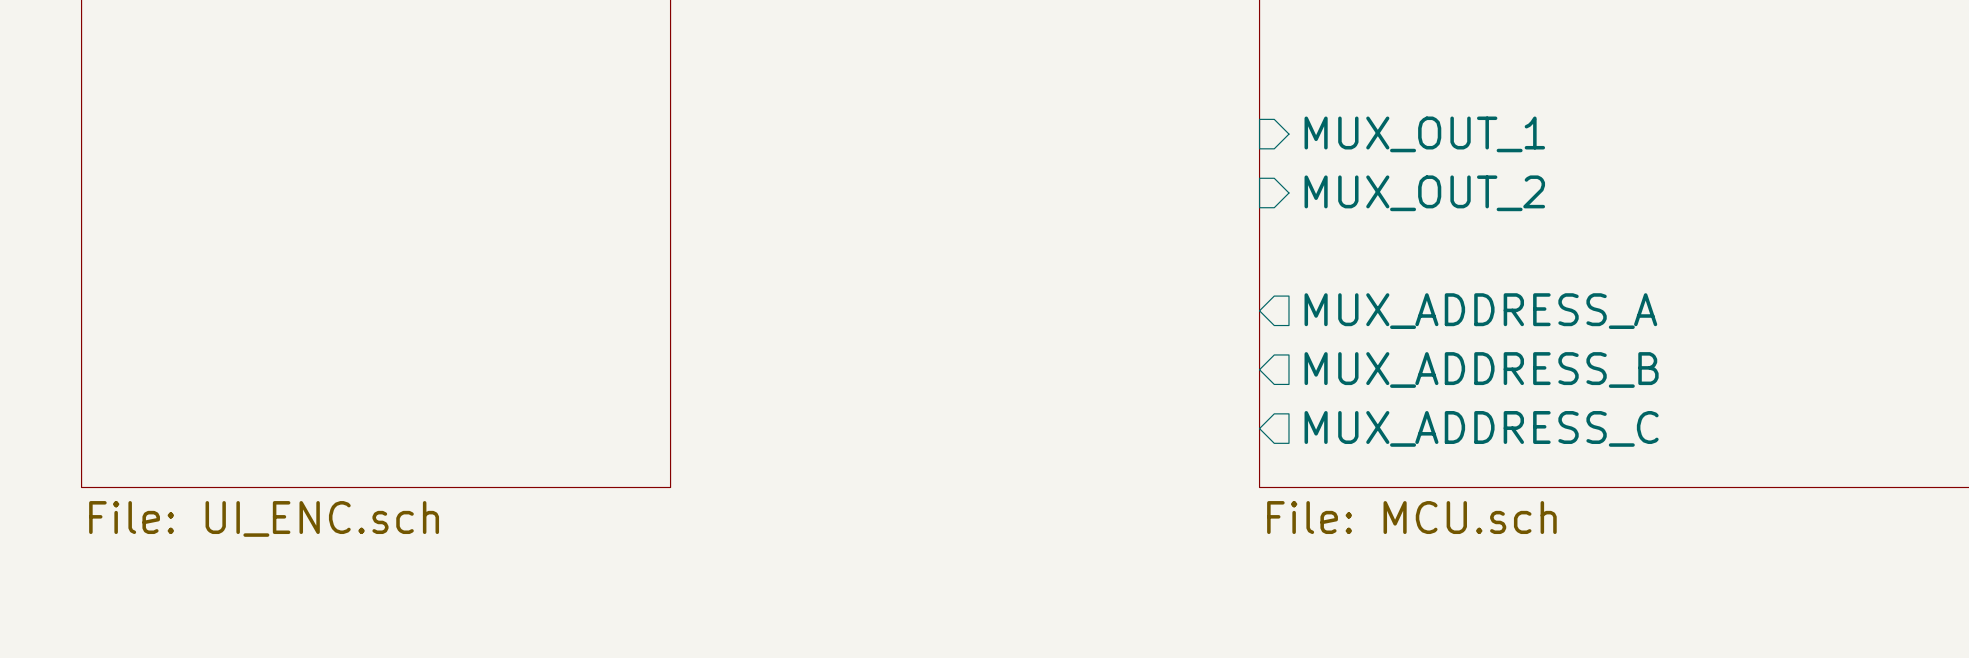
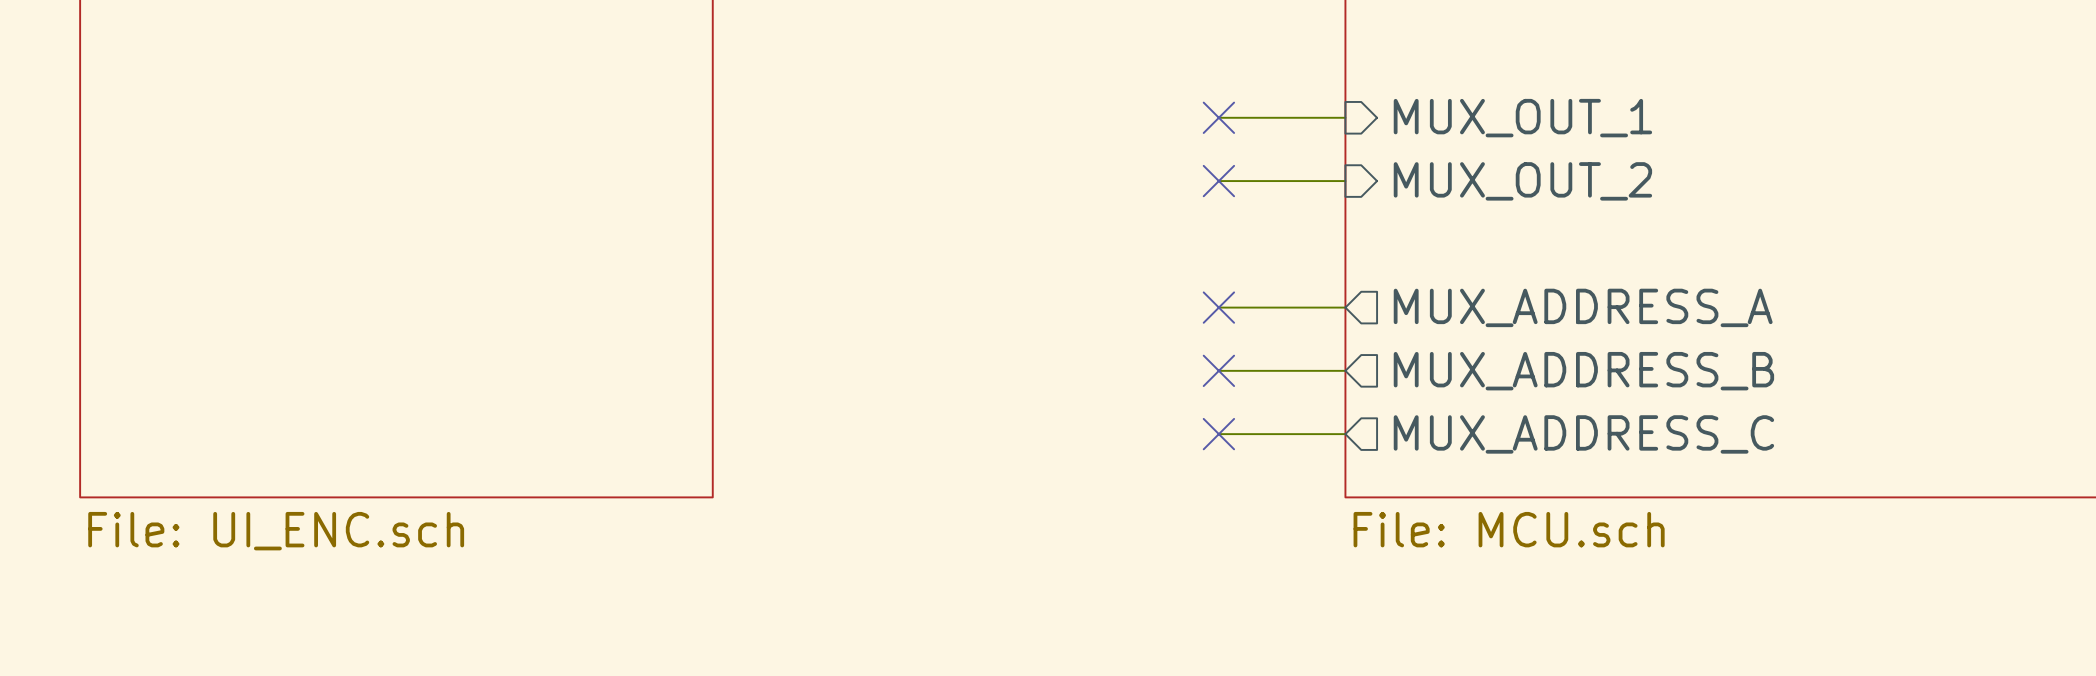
wire: none -> (1218, 117) (1345, 117)
no-connect mark: none -> (1218, 117)
wire: none -> (1218, 181) (1345, 181)
no-connect mark: none -> (1218, 181)
wire: none -> (1218, 307) (1345, 307)
no-connect mark: none -> (1218, 307)
wire: none -> (1218, 370) (1345, 370)
no-connect mark: none -> (1218, 370)
wire: none -> (1218, 434) (1345, 434)
no-connect mark: none -> (1218, 434)

